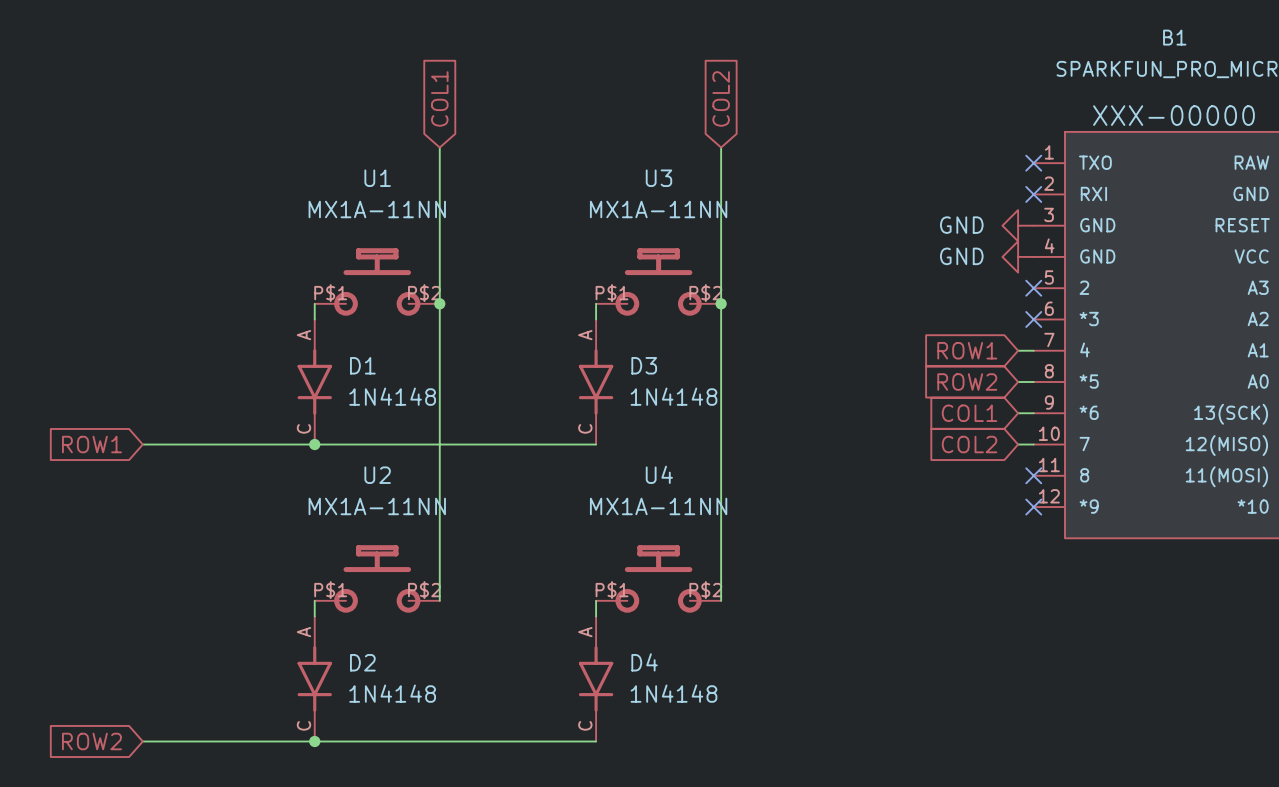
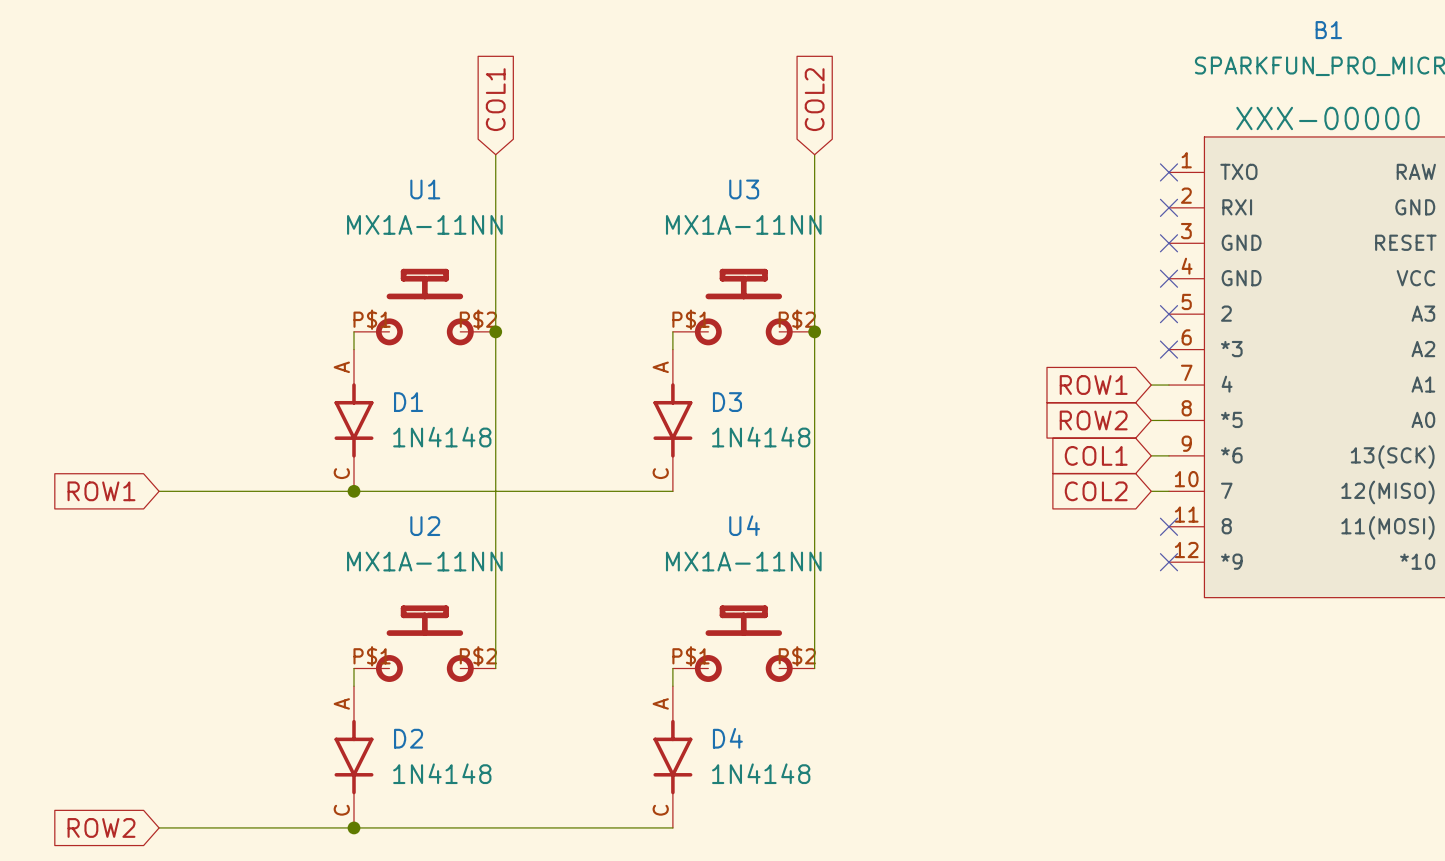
power symbol: GND (1018, 225) -> none
no-connect mark: none -> (1168, 243)
power symbol: GND (1018, 256) -> none
no-connect mark: none -> (1168, 278)

